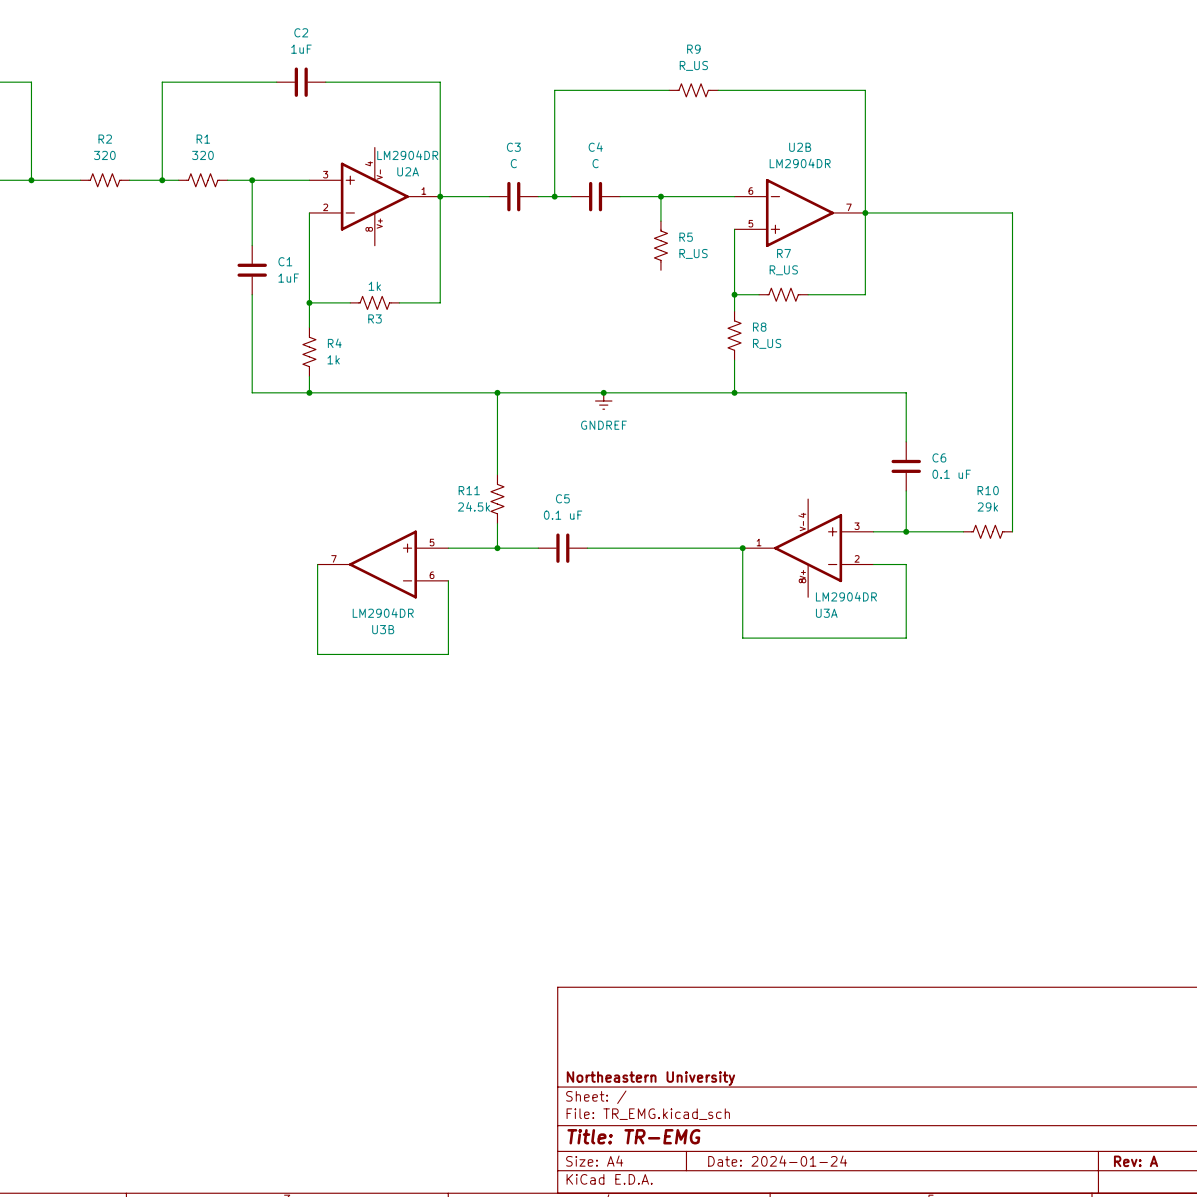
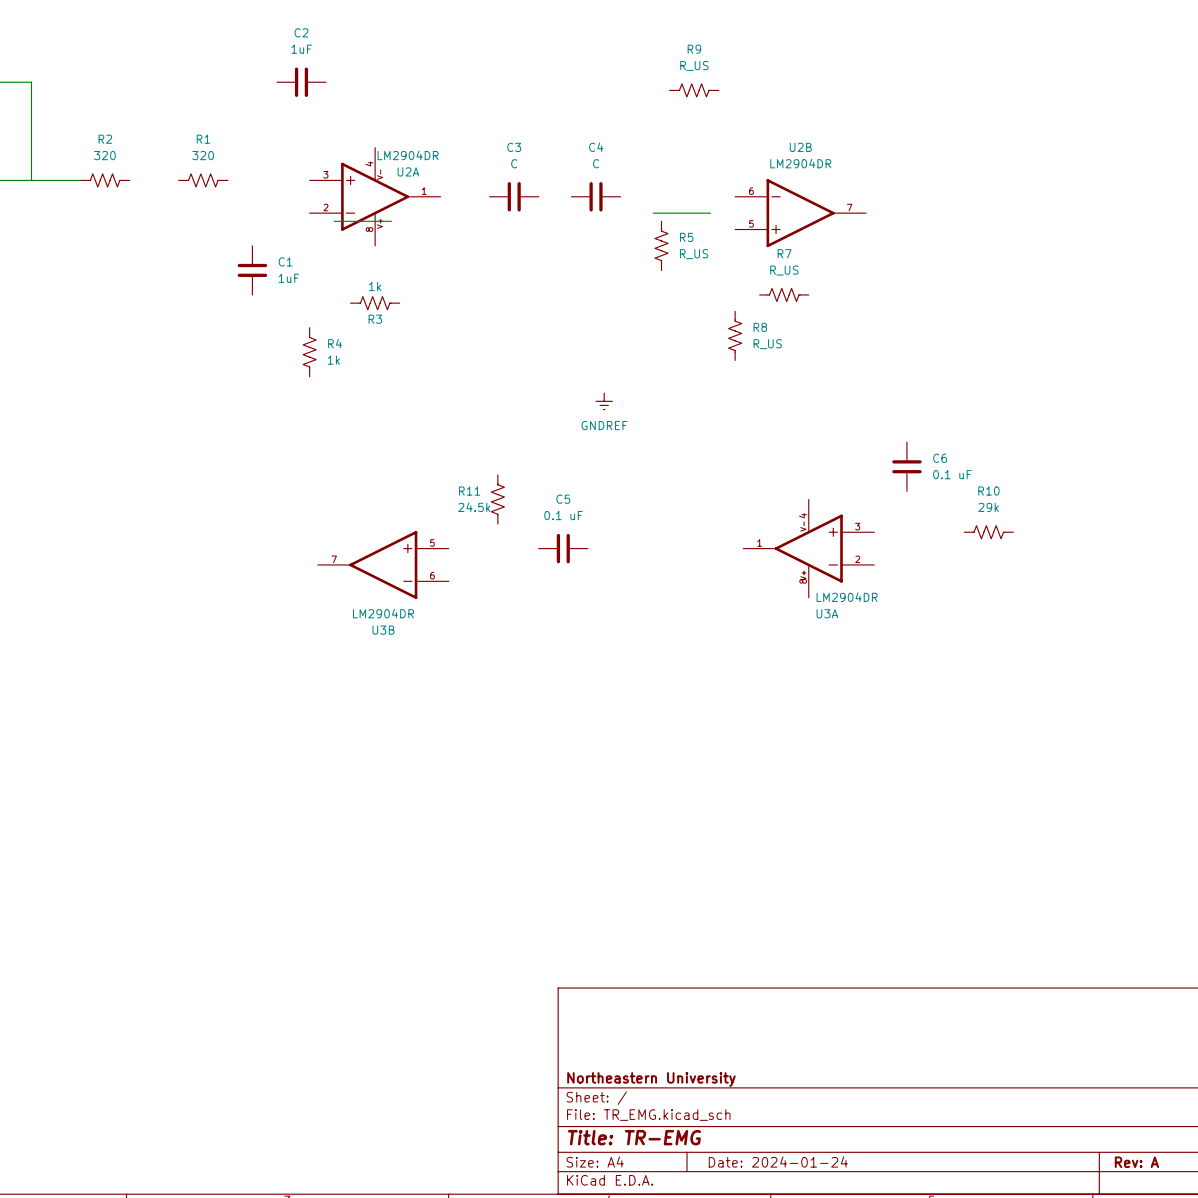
wire: (276, 82) (162, 82) (162, 180) -> none
wire: (325, 82) (440, 82) (440, 302) (399, 302) -> none
wire: (669, 90) (554, 90) (554, 196) -> none
wire: (718, 90) (865, 90) (865, 294) (808, 294) -> none
junction: (31, 180) -> none
wire: (129, 180) (178, 180) -> none
junction: (162, 180) -> none
wire: (227, 180) (309, 180) -> none
wire: (252, 180) (252, 245) -> none
junction: (252, 180) -> none
wire: (440, 196) (489, 196) -> none
junction: (440, 196) -> none
wire: (538, 196) (571, 196) -> none
junction: (554, 196) -> none
wire: (620, 196) (734, 196) -> none
wire: (660, 196) (660, 221) -> none
junction: (660, 196) -> none
wire: (309, 212) (309, 327) -> none
wire: none -> (653, 213) (710, 213)
wire: (865, 212) (1012, 212) (1012, 531) -> none
junction: (865, 212) -> none
wire: none -> (334, 221) (391, 221)
wire: (734, 229) (734, 311) -> none
wire: (252, 294) (252, 392) (906, 392) (906, 441) -> none
wire: (734, 294) (759, 294) -> none
junction: (734, 294) -> none
wire: (309, 302) (350, 302) -> none
junction: (309, 302) -> none
wire: (734, 360) (734, 392) -> none
wire: (309, 376) (309, 392) -> none
junction: (309, 392) -> none
wire: (497, 392) (497, 474) -> none
junction: (497, 392) -> none
junction: (603, 392) -> none
junction: (734, 392) -> none
wire: (906, 490) (906, 531) -> none
wire: (497, 523) (497, 548) -> none
wire: (873, 531) (963, 531) -> none
junction: (906, 531) -> none
wire: (448, 548) (538, 548) -> none
junction: (497, 548) -> none
wire: (587, 548) (742, 548) (742, 638) (906, 638) (906, 564) (873, 564) -> none
junction: (742, 548) -> none
wire: (317, 564) (317, 654) (448, 654) (448, 580) -> none

